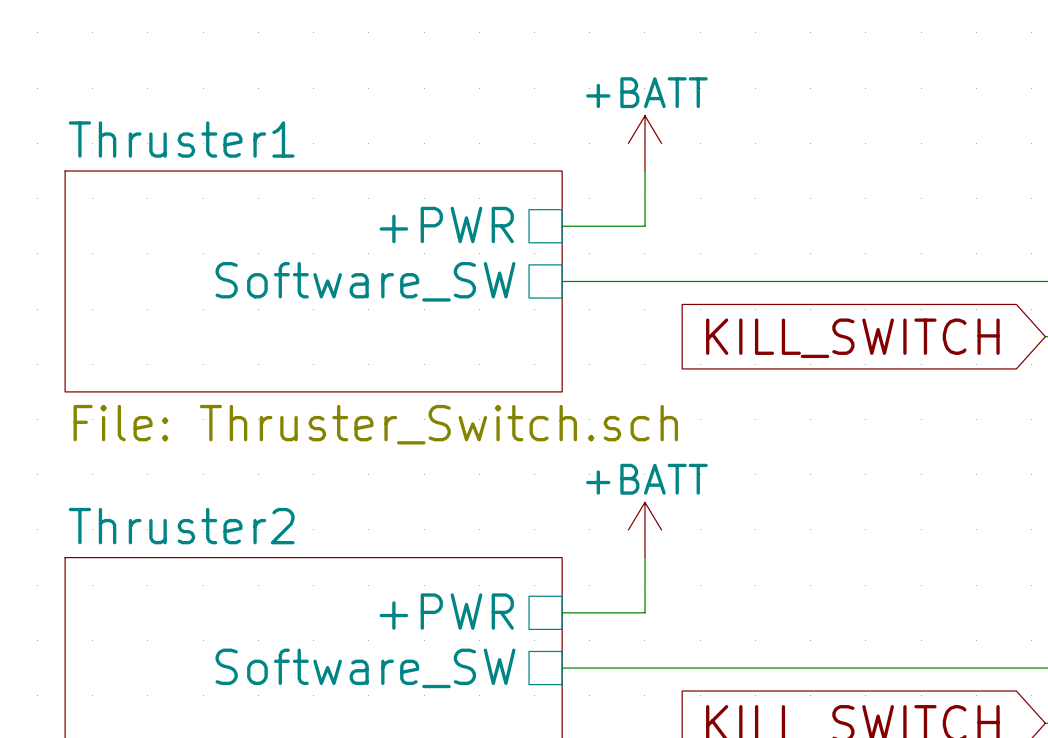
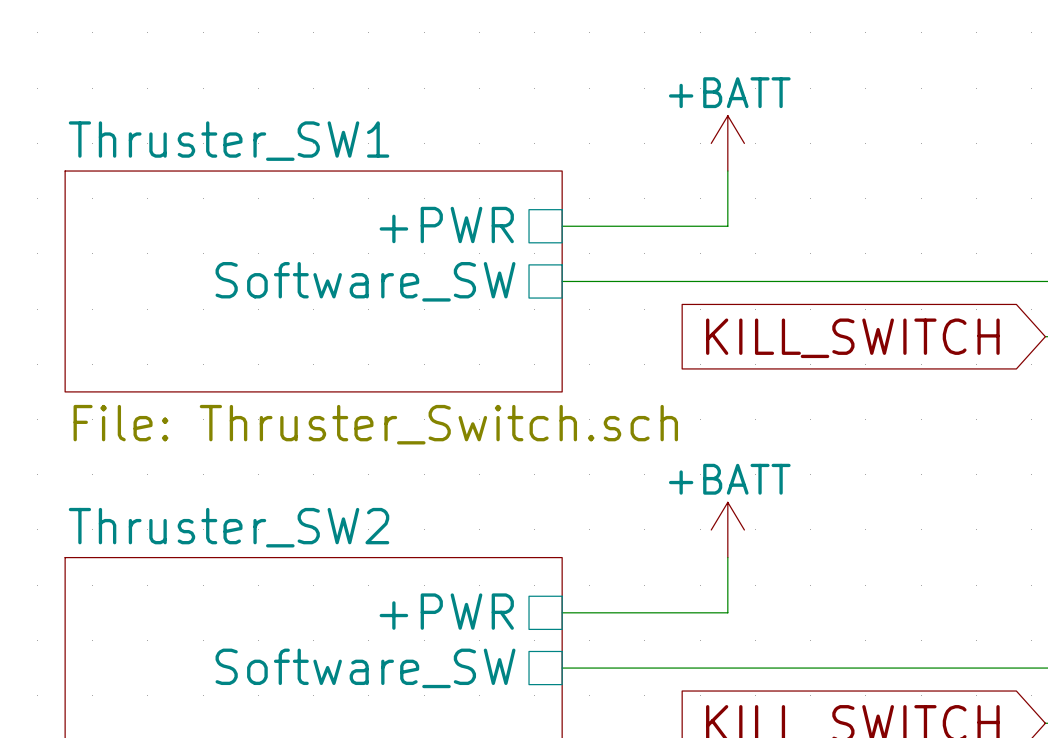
sheet Thruster1 name: Thruster1 (181, 139) -> Thruster_SW1 (229, 141)
power symbol position: +BATT (644, 143) -> +BATT (727, 143)
wire: (644, 171) (644, 226) -> (727, 171) (727, 226) (644, 226)
sheet Thruster2 name: Thruster2 (181, 526) -> Thruster_SW2 (229, 527)
power symbol position: +BATT (644, 529) -> +BATT (727, 529)
wire: (644, 557) (644, 612) -> (727, 557) (727, 612) (644, 612)

